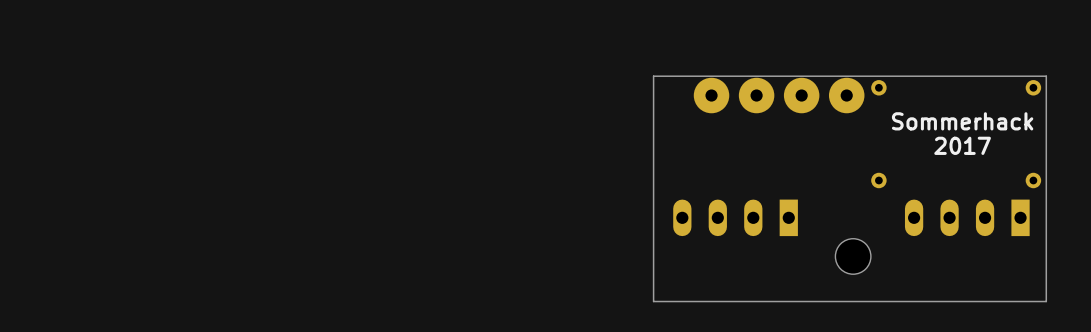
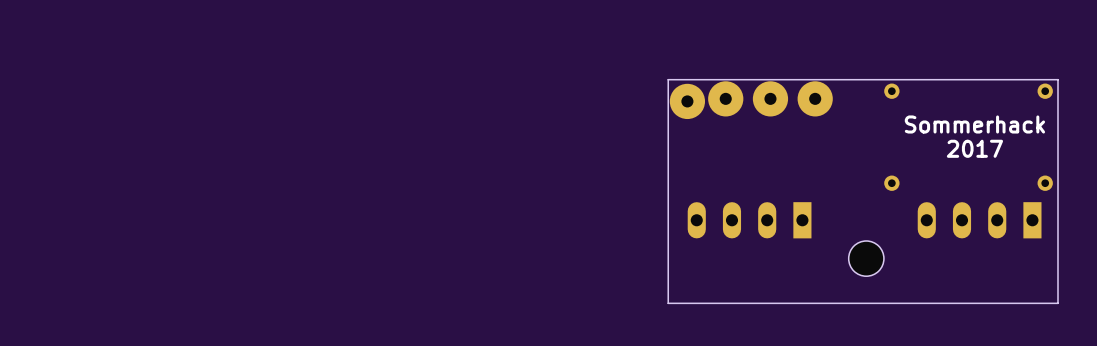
part position: (846, 95) -> (687, 101)

